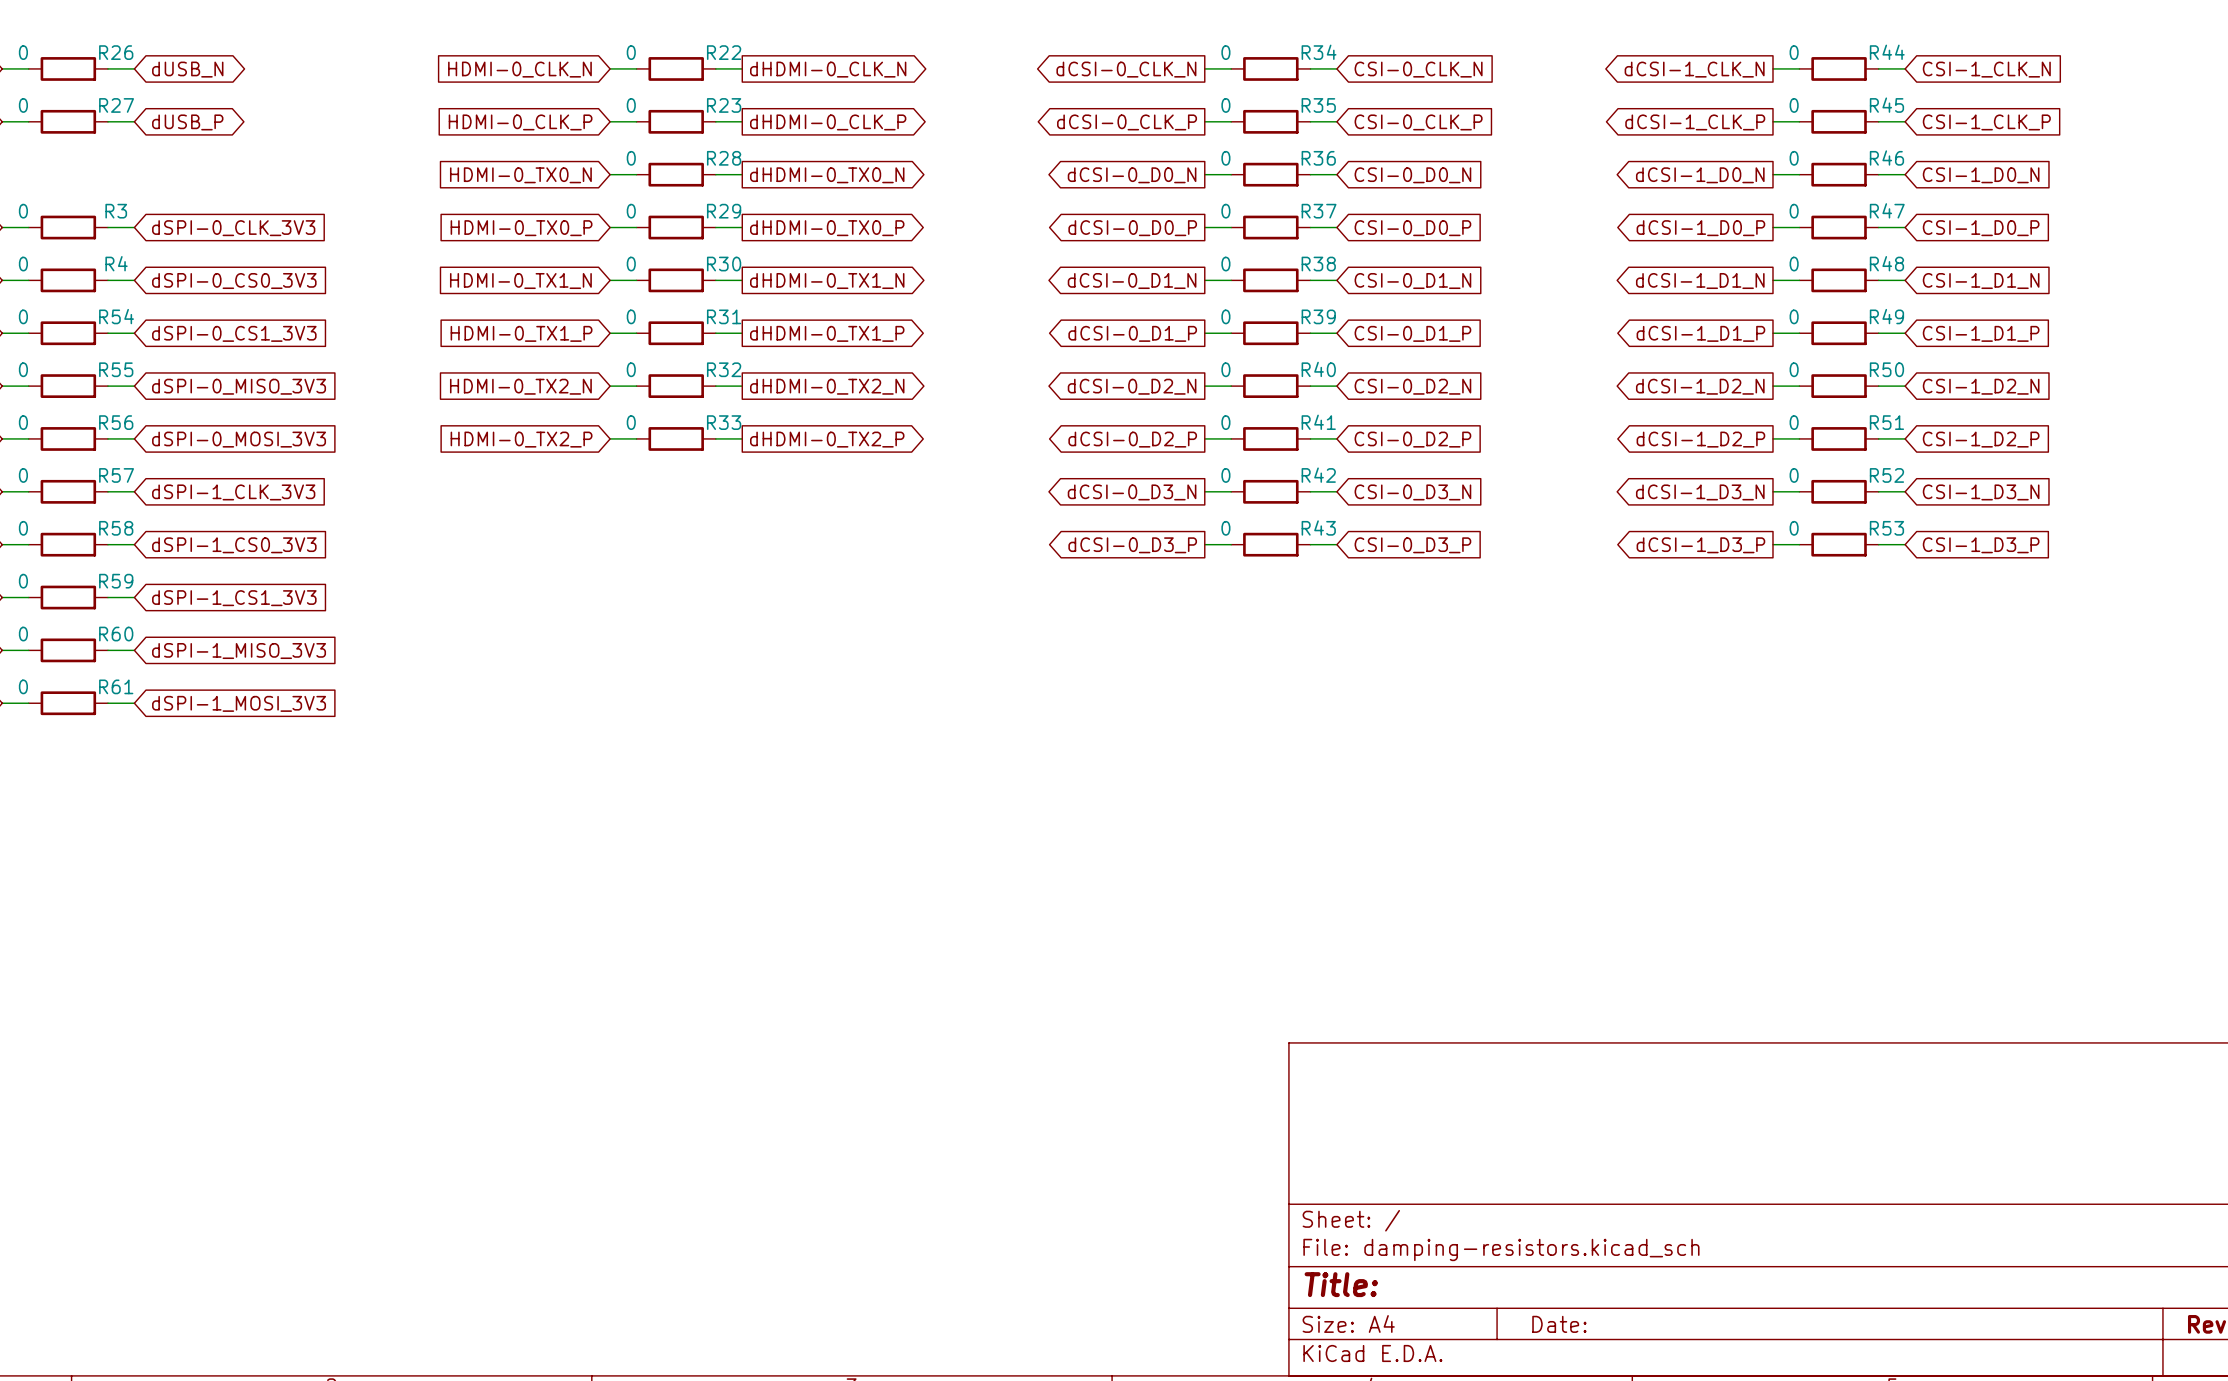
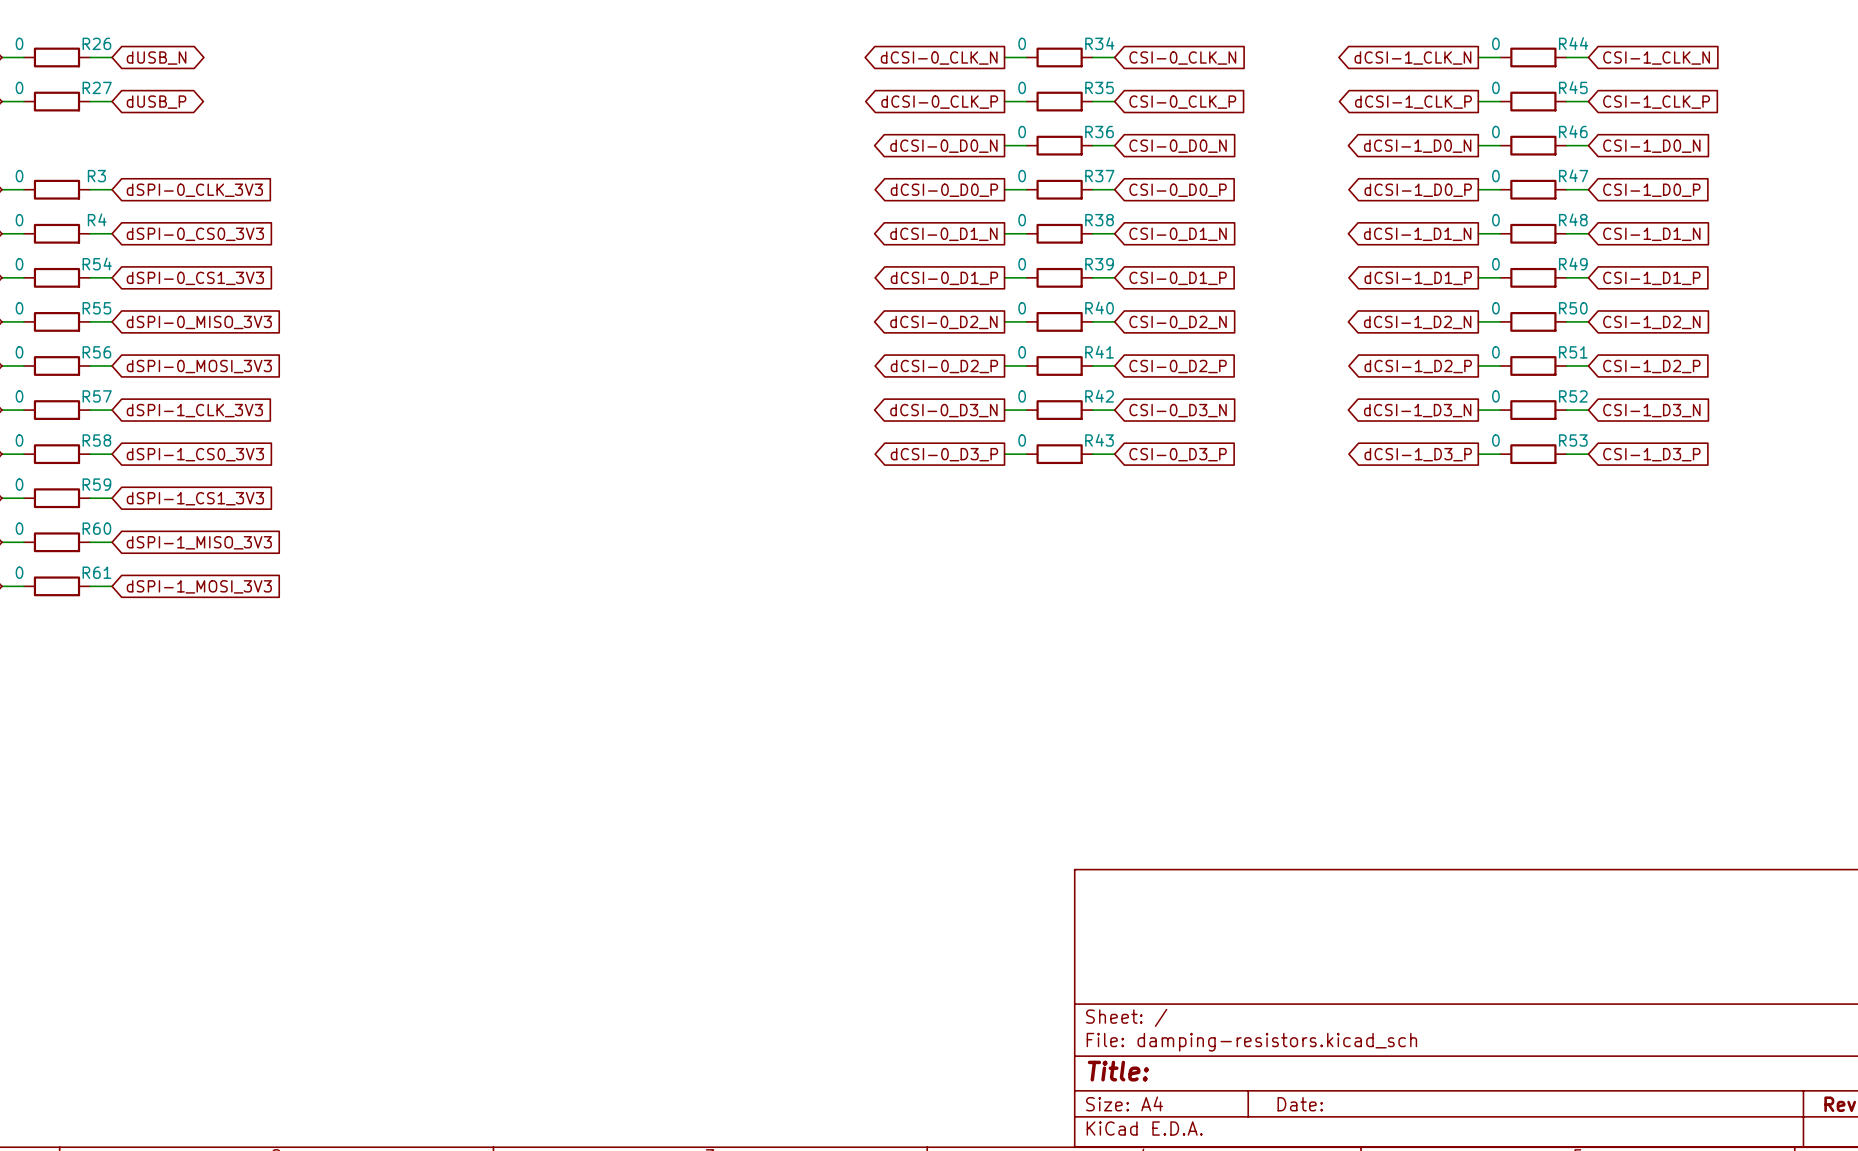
wire: (610, 68) (636, 68) -> none
R22: 0 (676, 68) -> none
wire: (715, 68) (742, 68) -> none
global label: HDMI-0_CLK_N (519, 69) -> none
global label: dHDMI-0_CLK_N (828, 69) -> none
wire: (610, 121) (636, 121) -> none
R23: 0 (676, 121) -> none
wire: (715, 121) (742, 121) -> none
global label: HDMI-0_CLK_P (520, 122) -> none
global label: dHDMI-0_CLK_P (828, 122) -> none
wire: (610, 174) (636, 174) -> none
R28: 0 (676, 174) -> none
wire: (715, 174) (742, 174) -> none
global label: HDMI-0_TX0_N (520, 175) -> none
global label: dHDMI-0_TX0_N (827, 175) -> none
wire: (610, 227) (636, 227) -> none
R29: 0 (676, 227) -> none
wire: (715, 227) (742, 227) -> none
global label: HDMI-0_TX0_P (521, 228) -> none
global label: dHDMI-0_TX0_P (827, 228) -> none
wire: (610, 280) (636, 280) -> none
R30: 0 (676, 280) -> none
wire: (715, 280) (742, 280) -> none
global label: HDMI-0_TX1_N (520, 281) -> none
global label: dHDMI-0_TX1_N (827, 281) -> none
global label: HDMI-0_TX1_P (521, 333) -> none
wire: (610, 333) (636, 333) -> none
R31: 0 (676, 333) -> none
wire: (715, 333) (742, 333) -> none
global label: dHDMI-0_TX1_P (827, 333) -> none
global label: HDMI-0_TX2_N (520, 386) -> none
wire: (610, 386) (636, 386) -> none
R32: 0 (676, 386) -> none
wire: (715, 386) (742, 386) -> none
global label: dHDMI-0_TX2_N (827, 386) -> none
wire: (610, 438) (636, 438) -> none
R33: 0 (676, 438) -> none
wire: (715, 438) (742, 438) -> none
global label: HDMI-0_TX2_P (521, 439) -> none
global label: dHDMI-0_TX2_P (827, 439) -> none

